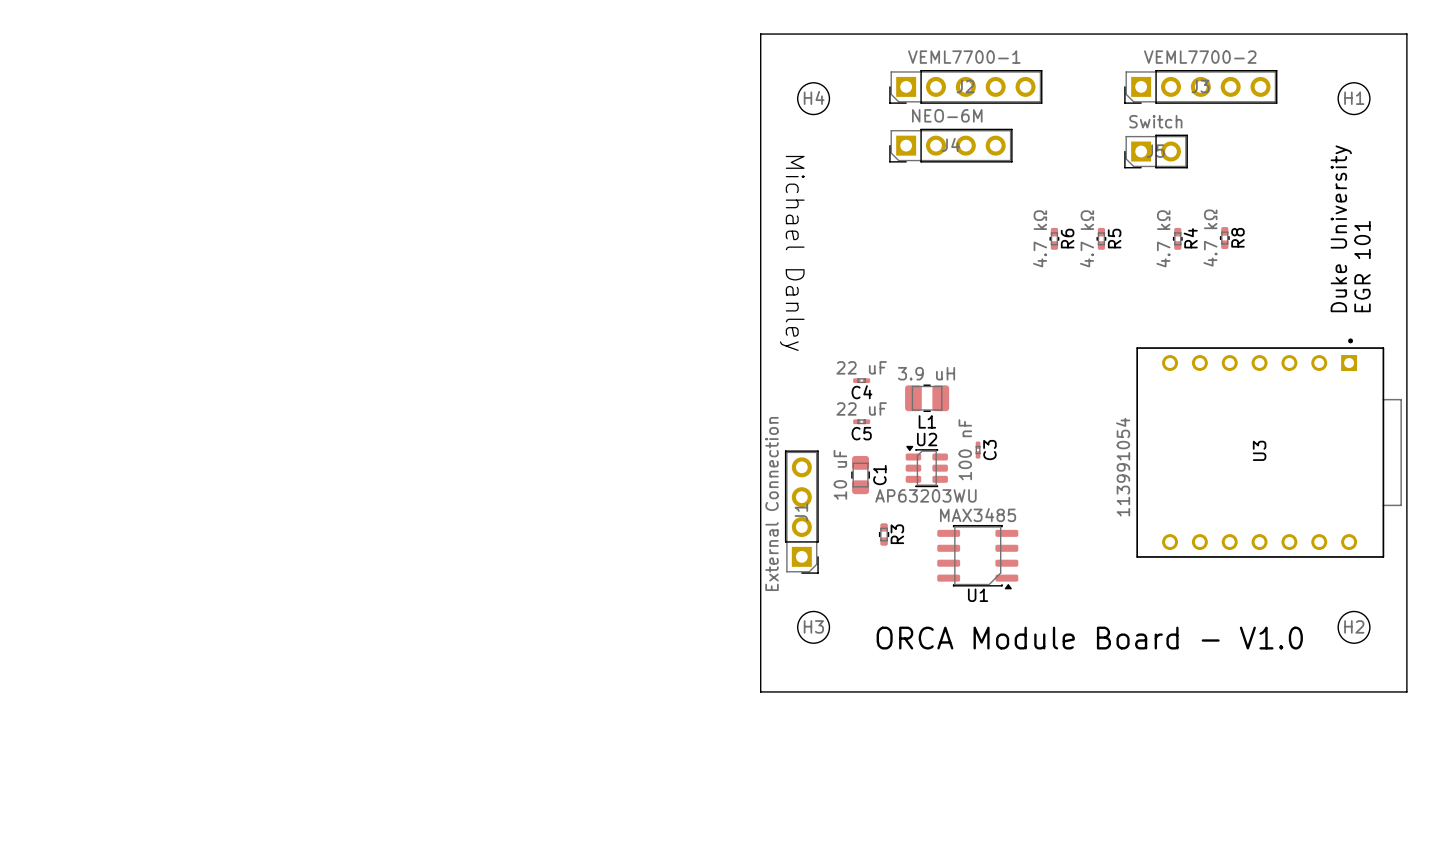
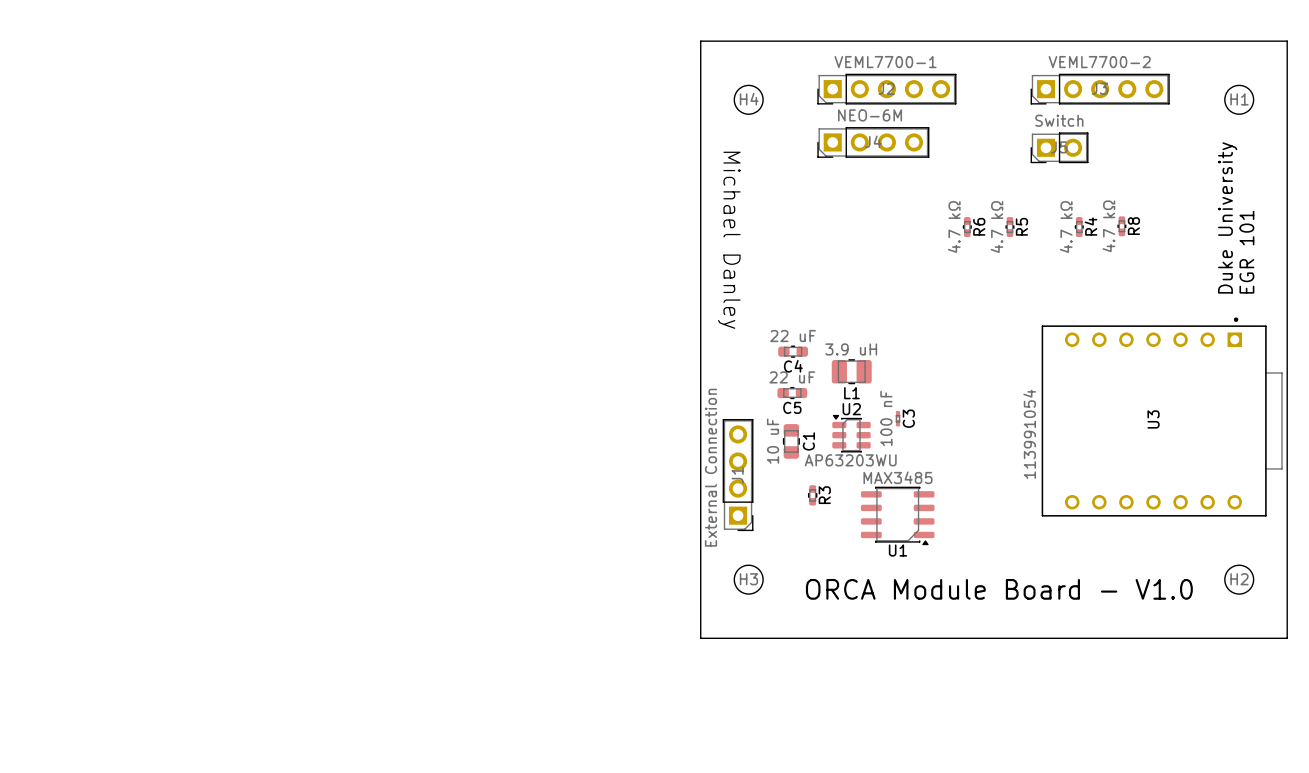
C4 footprint: [853, 378, 871, 383] -> [778, 345, 809, 358]
C5 footprint: [853, 419, 871, 425] -> [777, 386, 808, 400]

